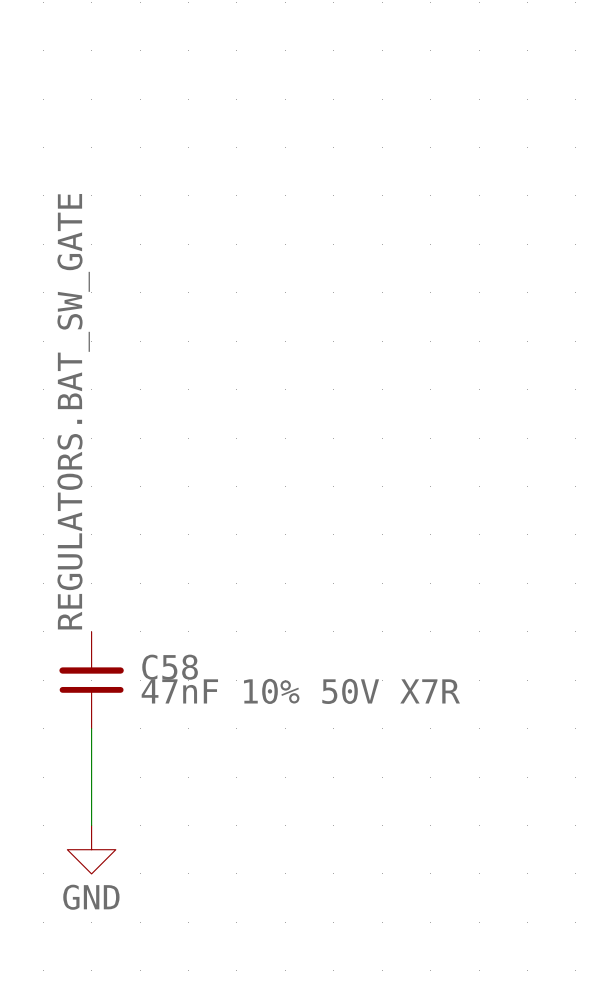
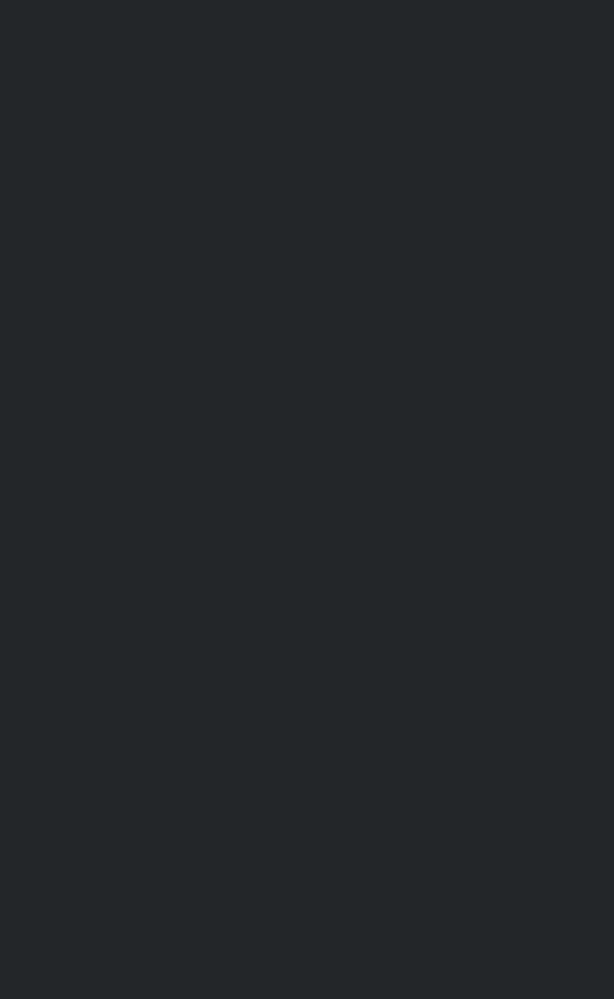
label: REGULATORS.BAT_SW_GATE (73, 411) -> none
C58: 47nF 10% 50V X7R (91, 680) -> none
wire: (91, 728) (91, 825) -> none
power symbol: GND (91, 849) -> none

